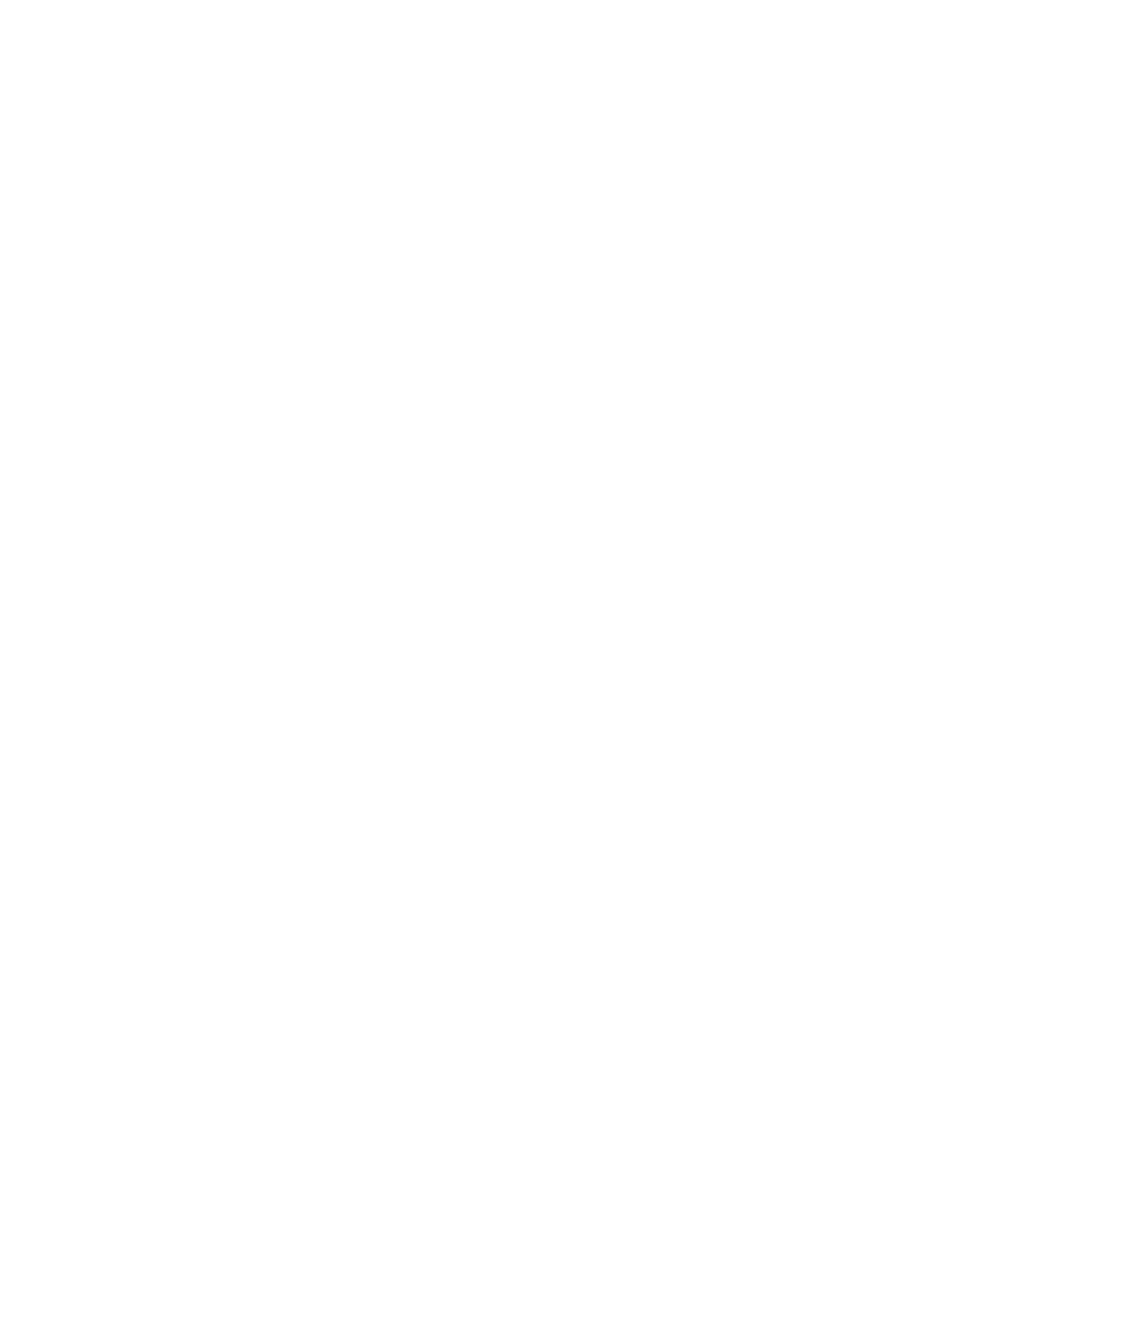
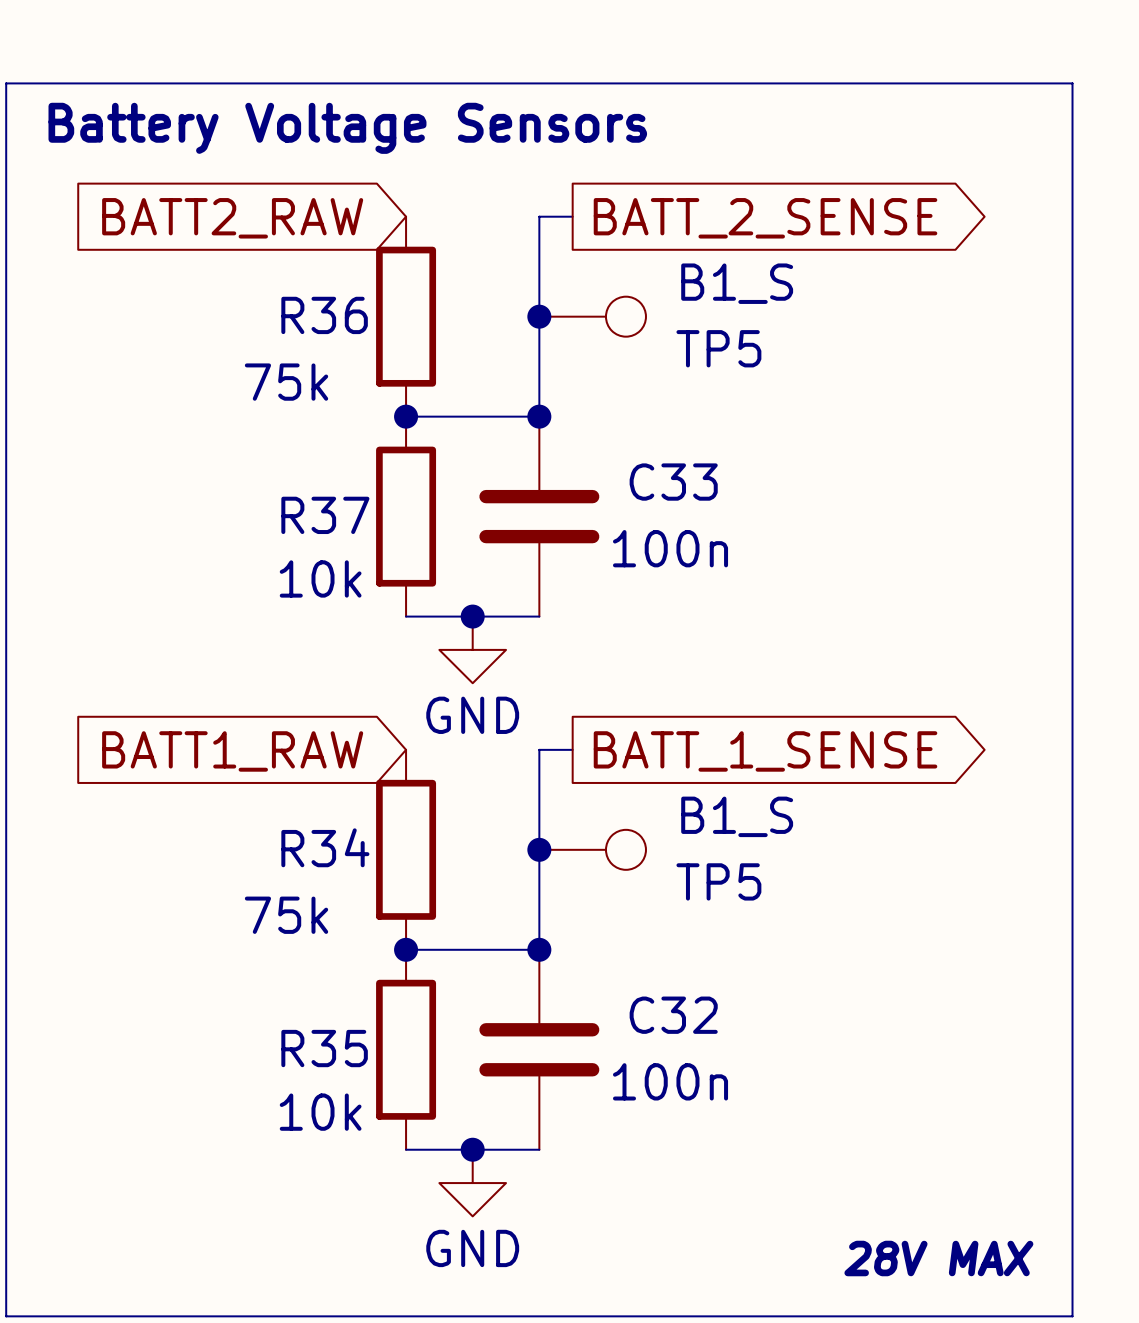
line: none -> (6, 83) (1072, 83) (1072, 1316) (6, 1316) (6, 83)
text: none -> Battery Voltage Sensors (347, 128)
wire: none -> (572, 216) (539, 216) (539, 416) (406, 416)
global label: none -> BATT2_RAW (232, 218)
global label: none -> BATT_2_SENSE (765, 218)
R36: none -> 75k (406, 316)
junction: none -> (539, 316)
TP5: none -> B1_S (592, 316)
junction: none -> (406, 416)
junction: none -> (539, 416)
R37: none -> 10k (406, 516)
C33: none -> 100n (539, 516)
wire: none -> (406, 616) (539, 616)
junction: none -> (472, 616)
power symbol: none -> GND (472, 649)
wire: none -> (572, 749) (539, 749) (539, 949) (406, 949)
global label: none -> BATT1_RAW (232, 751)
global label: none -> BATT_1_SENSE (765, 751)
R34: none -> 75k (406, 849)
junction: none -> (539, 849)
TP5: none -> B1_S (592, 849)
junction: none -> (406, 949)
junction: none -> (539, 949)
R35: none -> 10k (406, 1049)
C32: none -> 100n (539, 1049)
wire: none -> (406, 1149) (539, 1149)
junction: none -> (472, 1149)
power symbol: none -> GND (472, 1183)
text: none -> 28V MAX (938, 1258)

